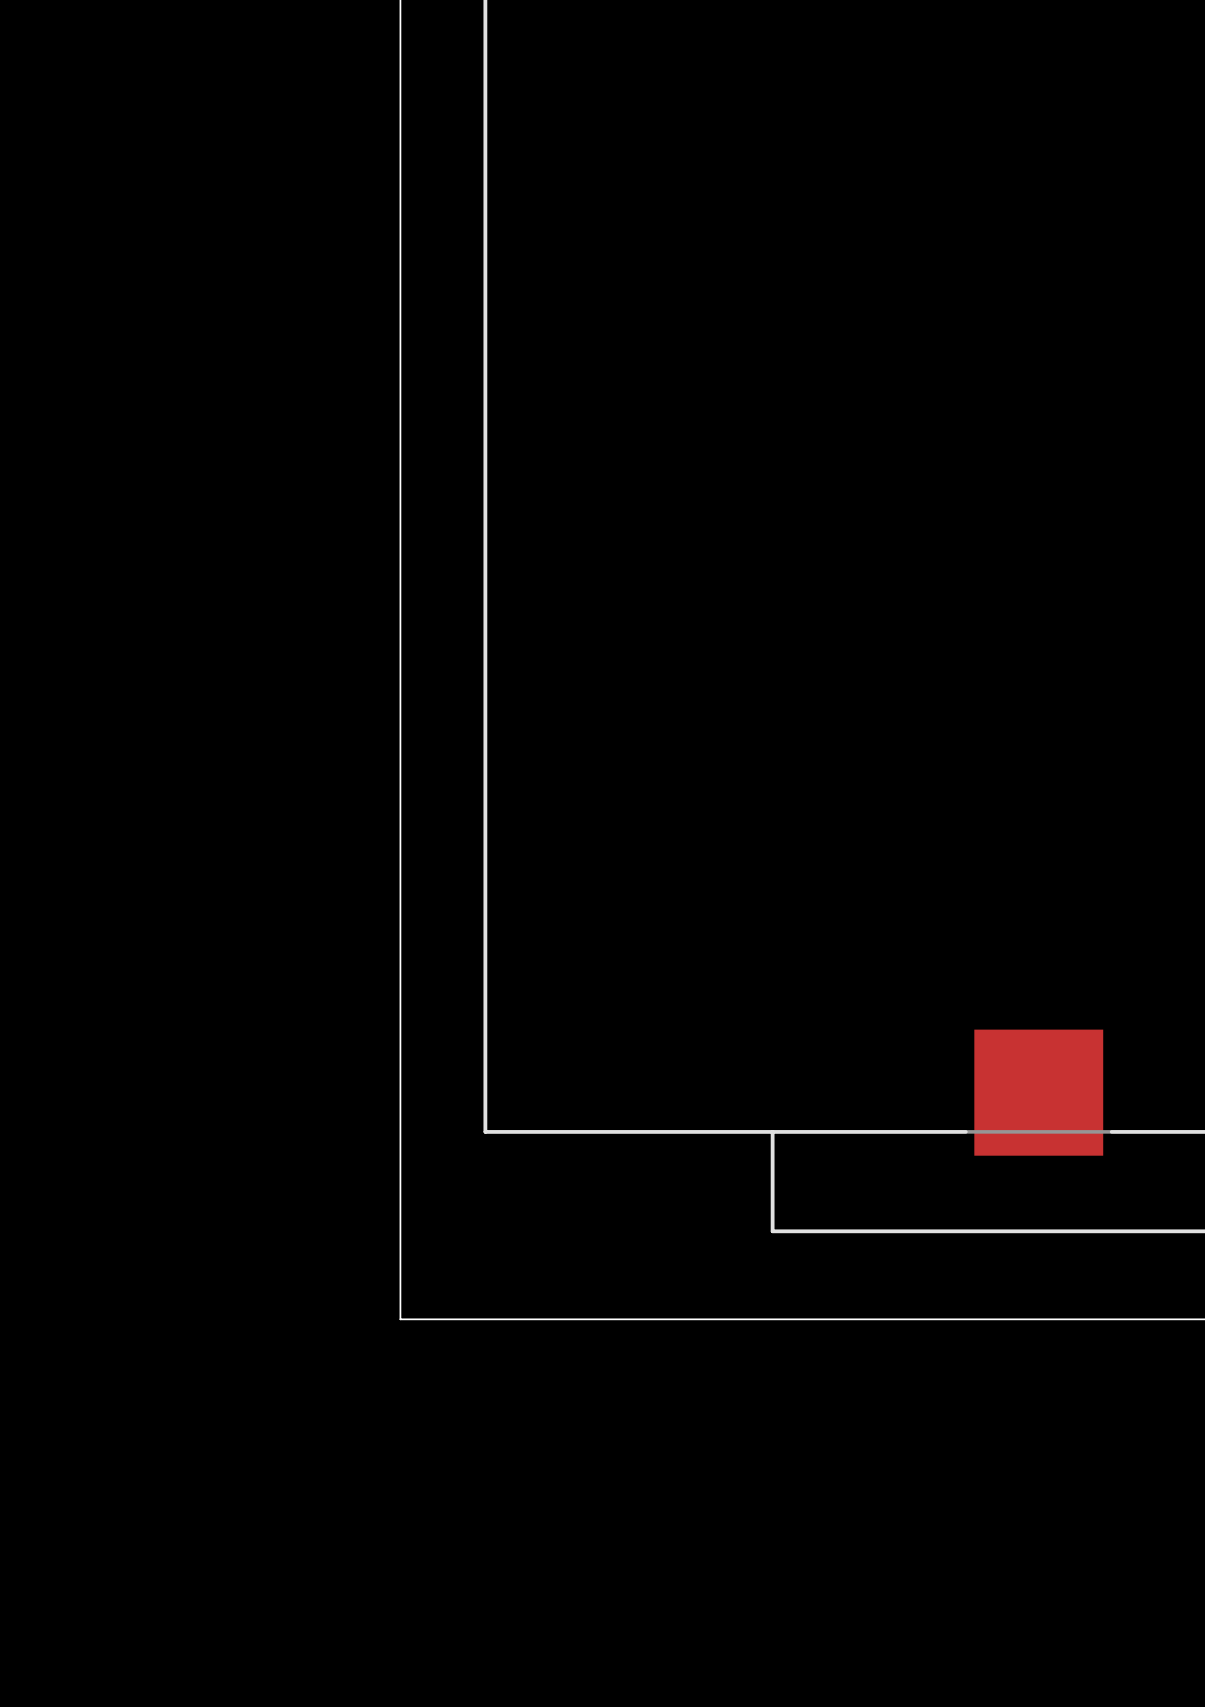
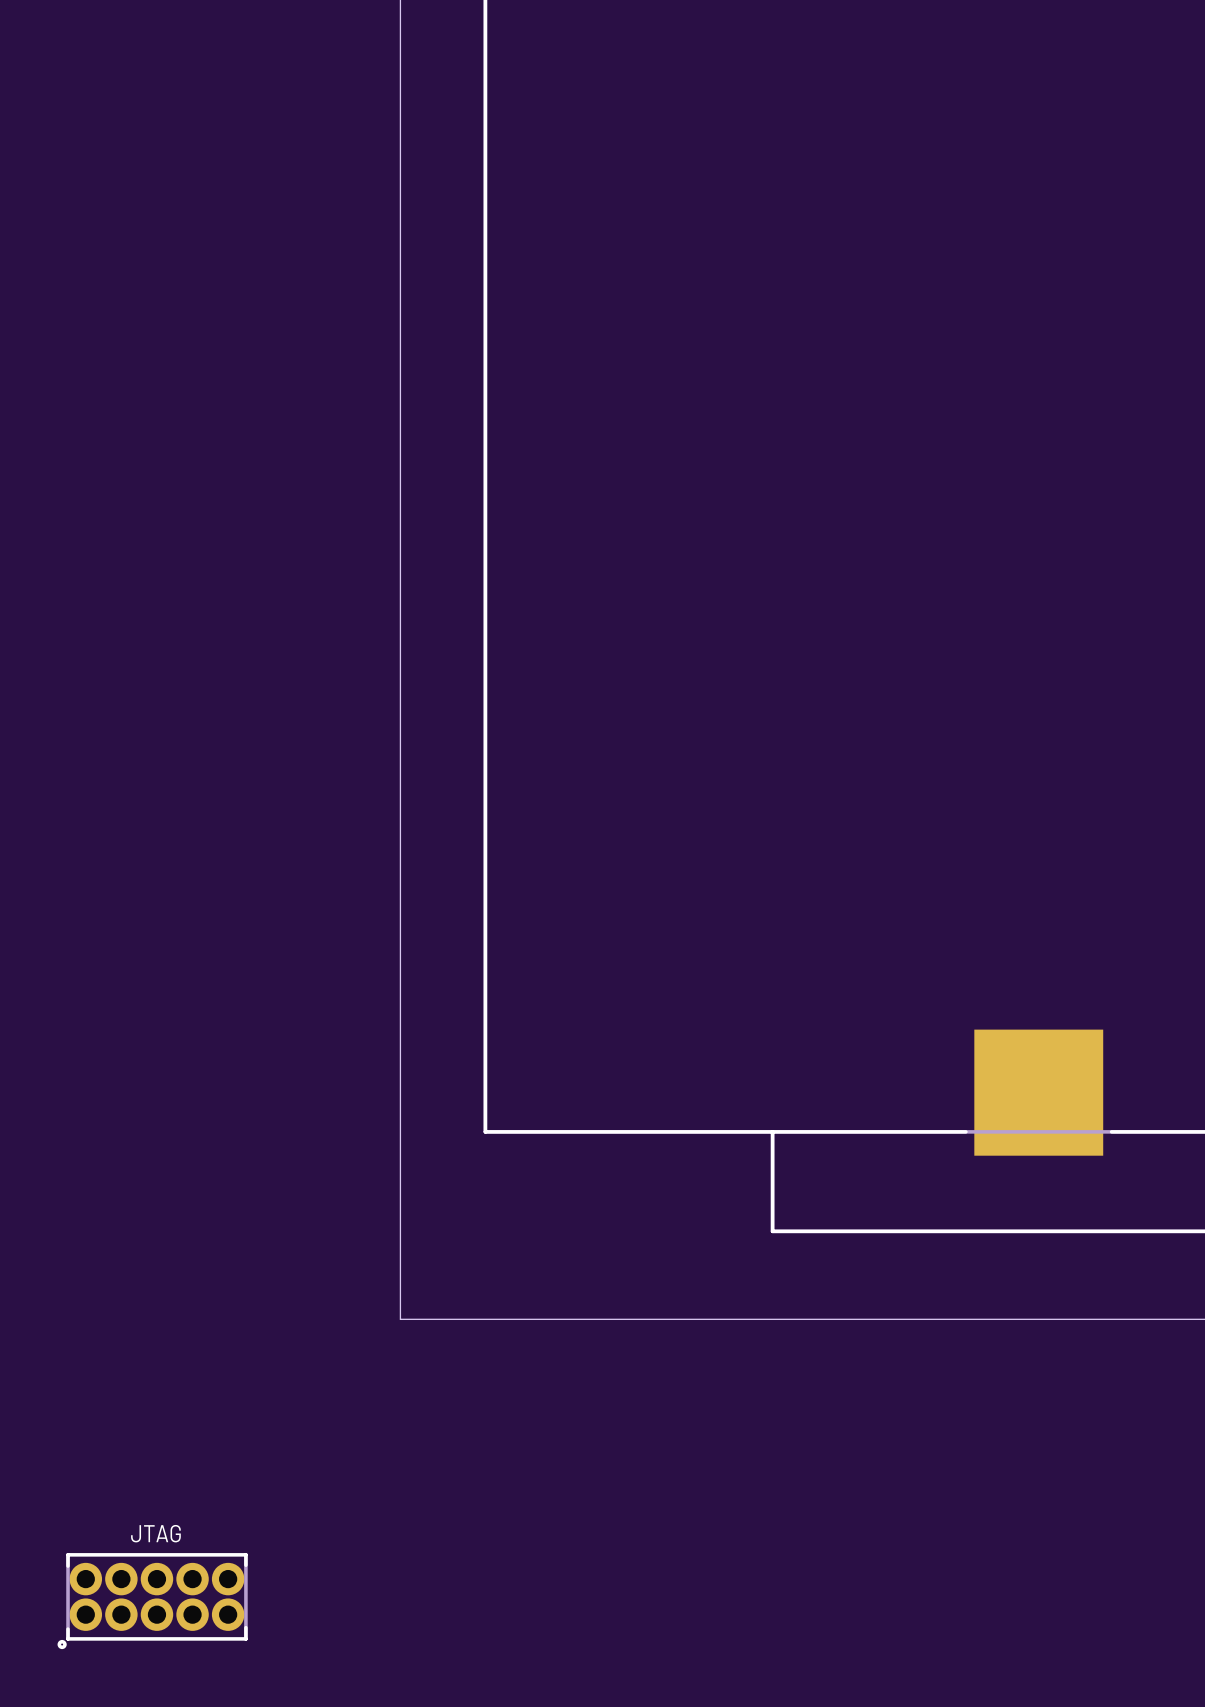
JTAG: none -> (152, 1601)

